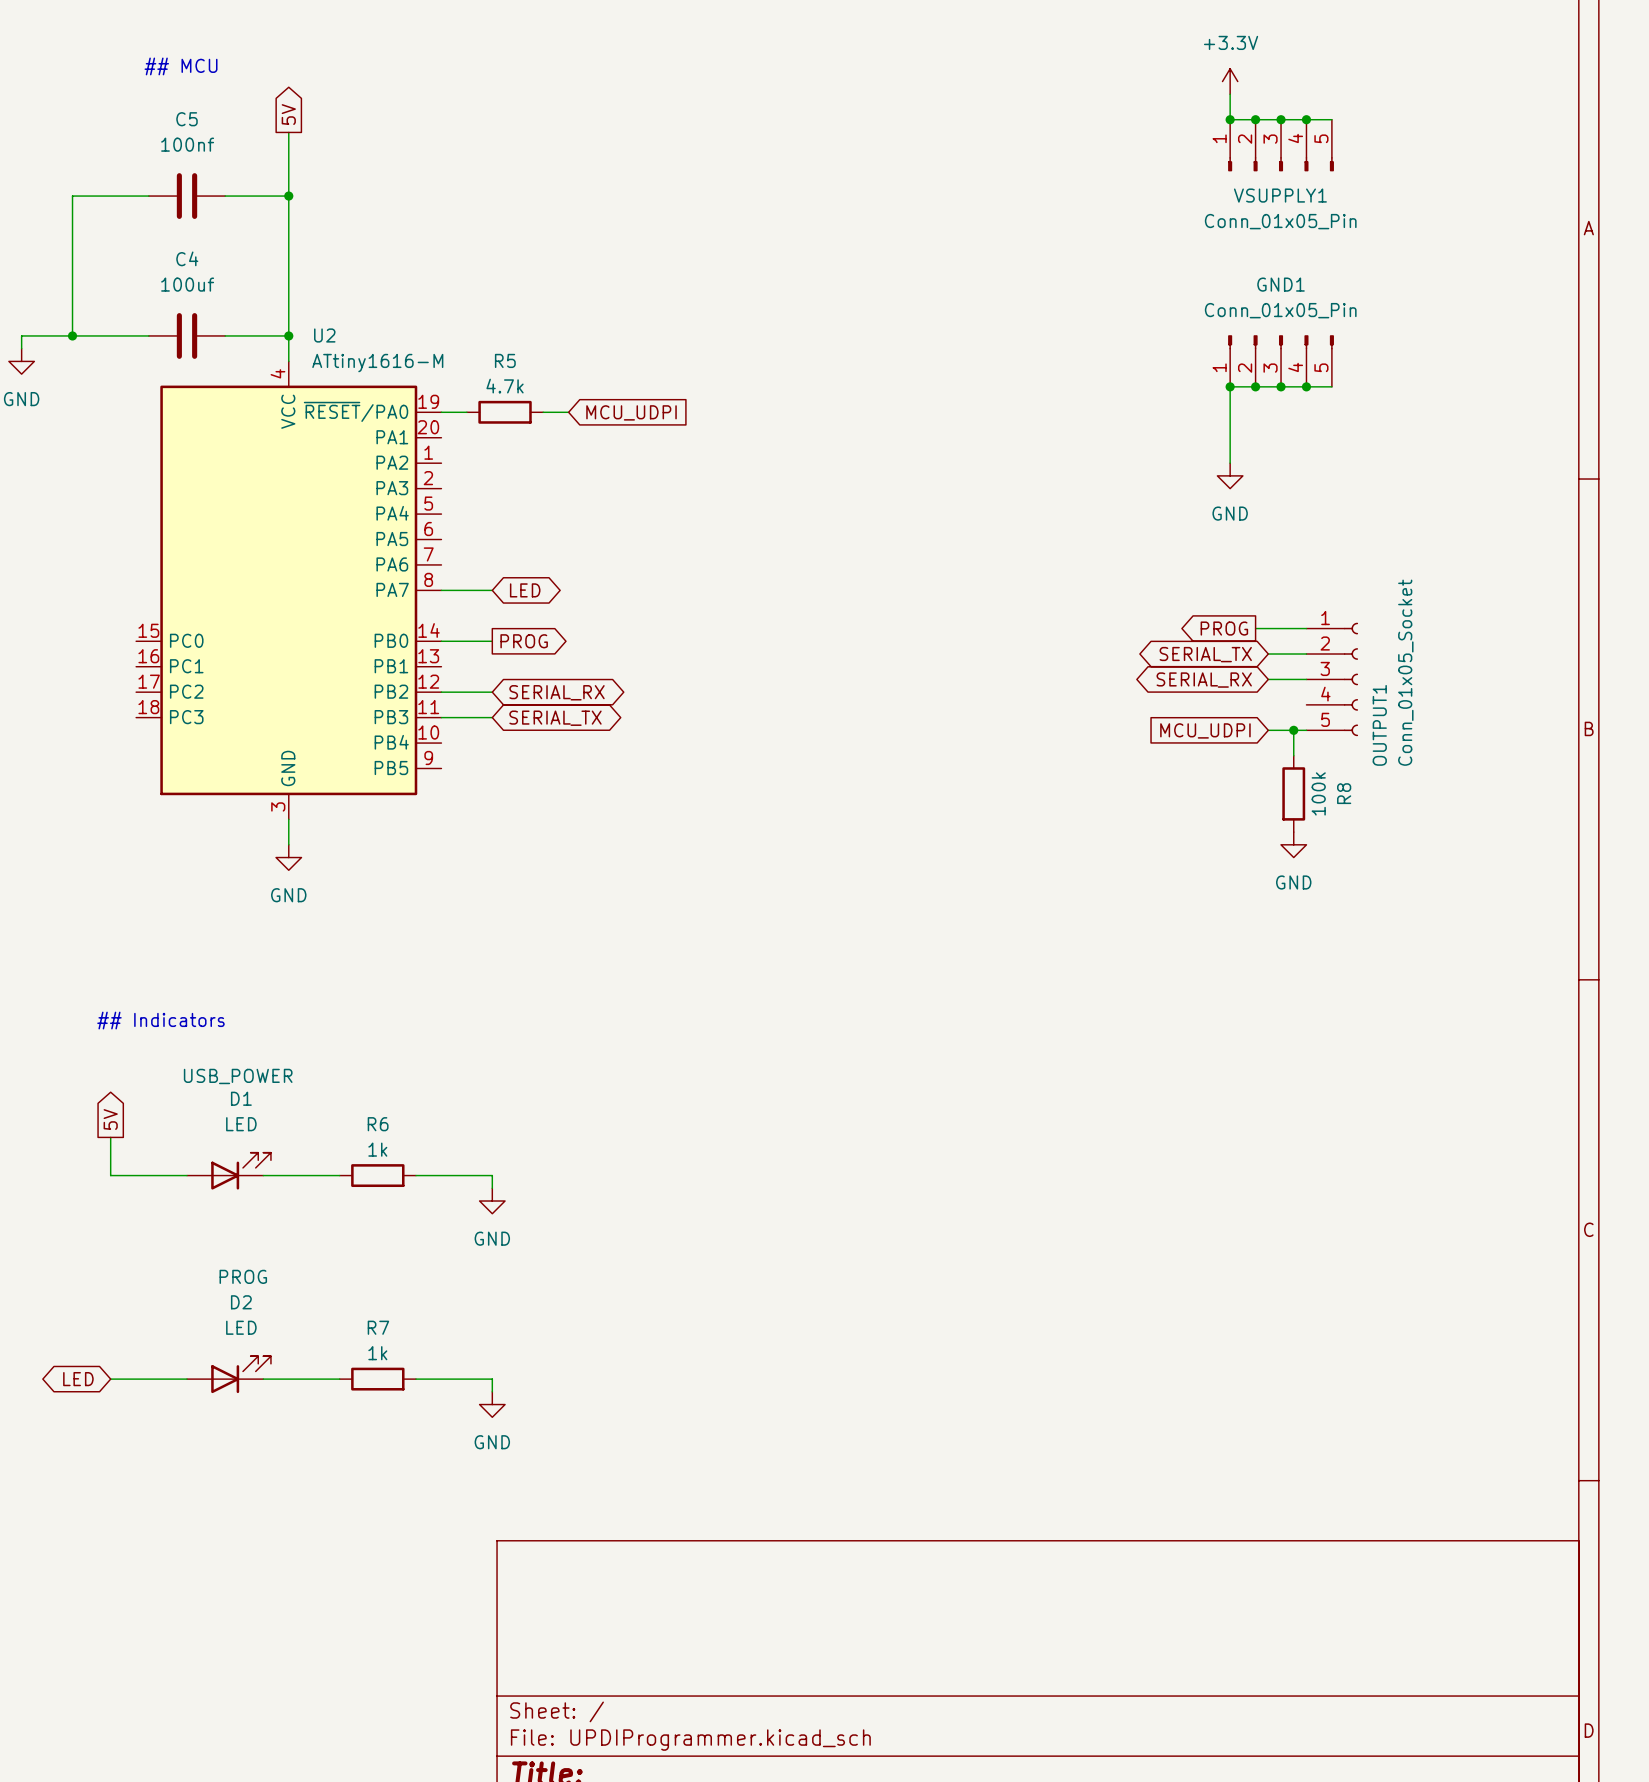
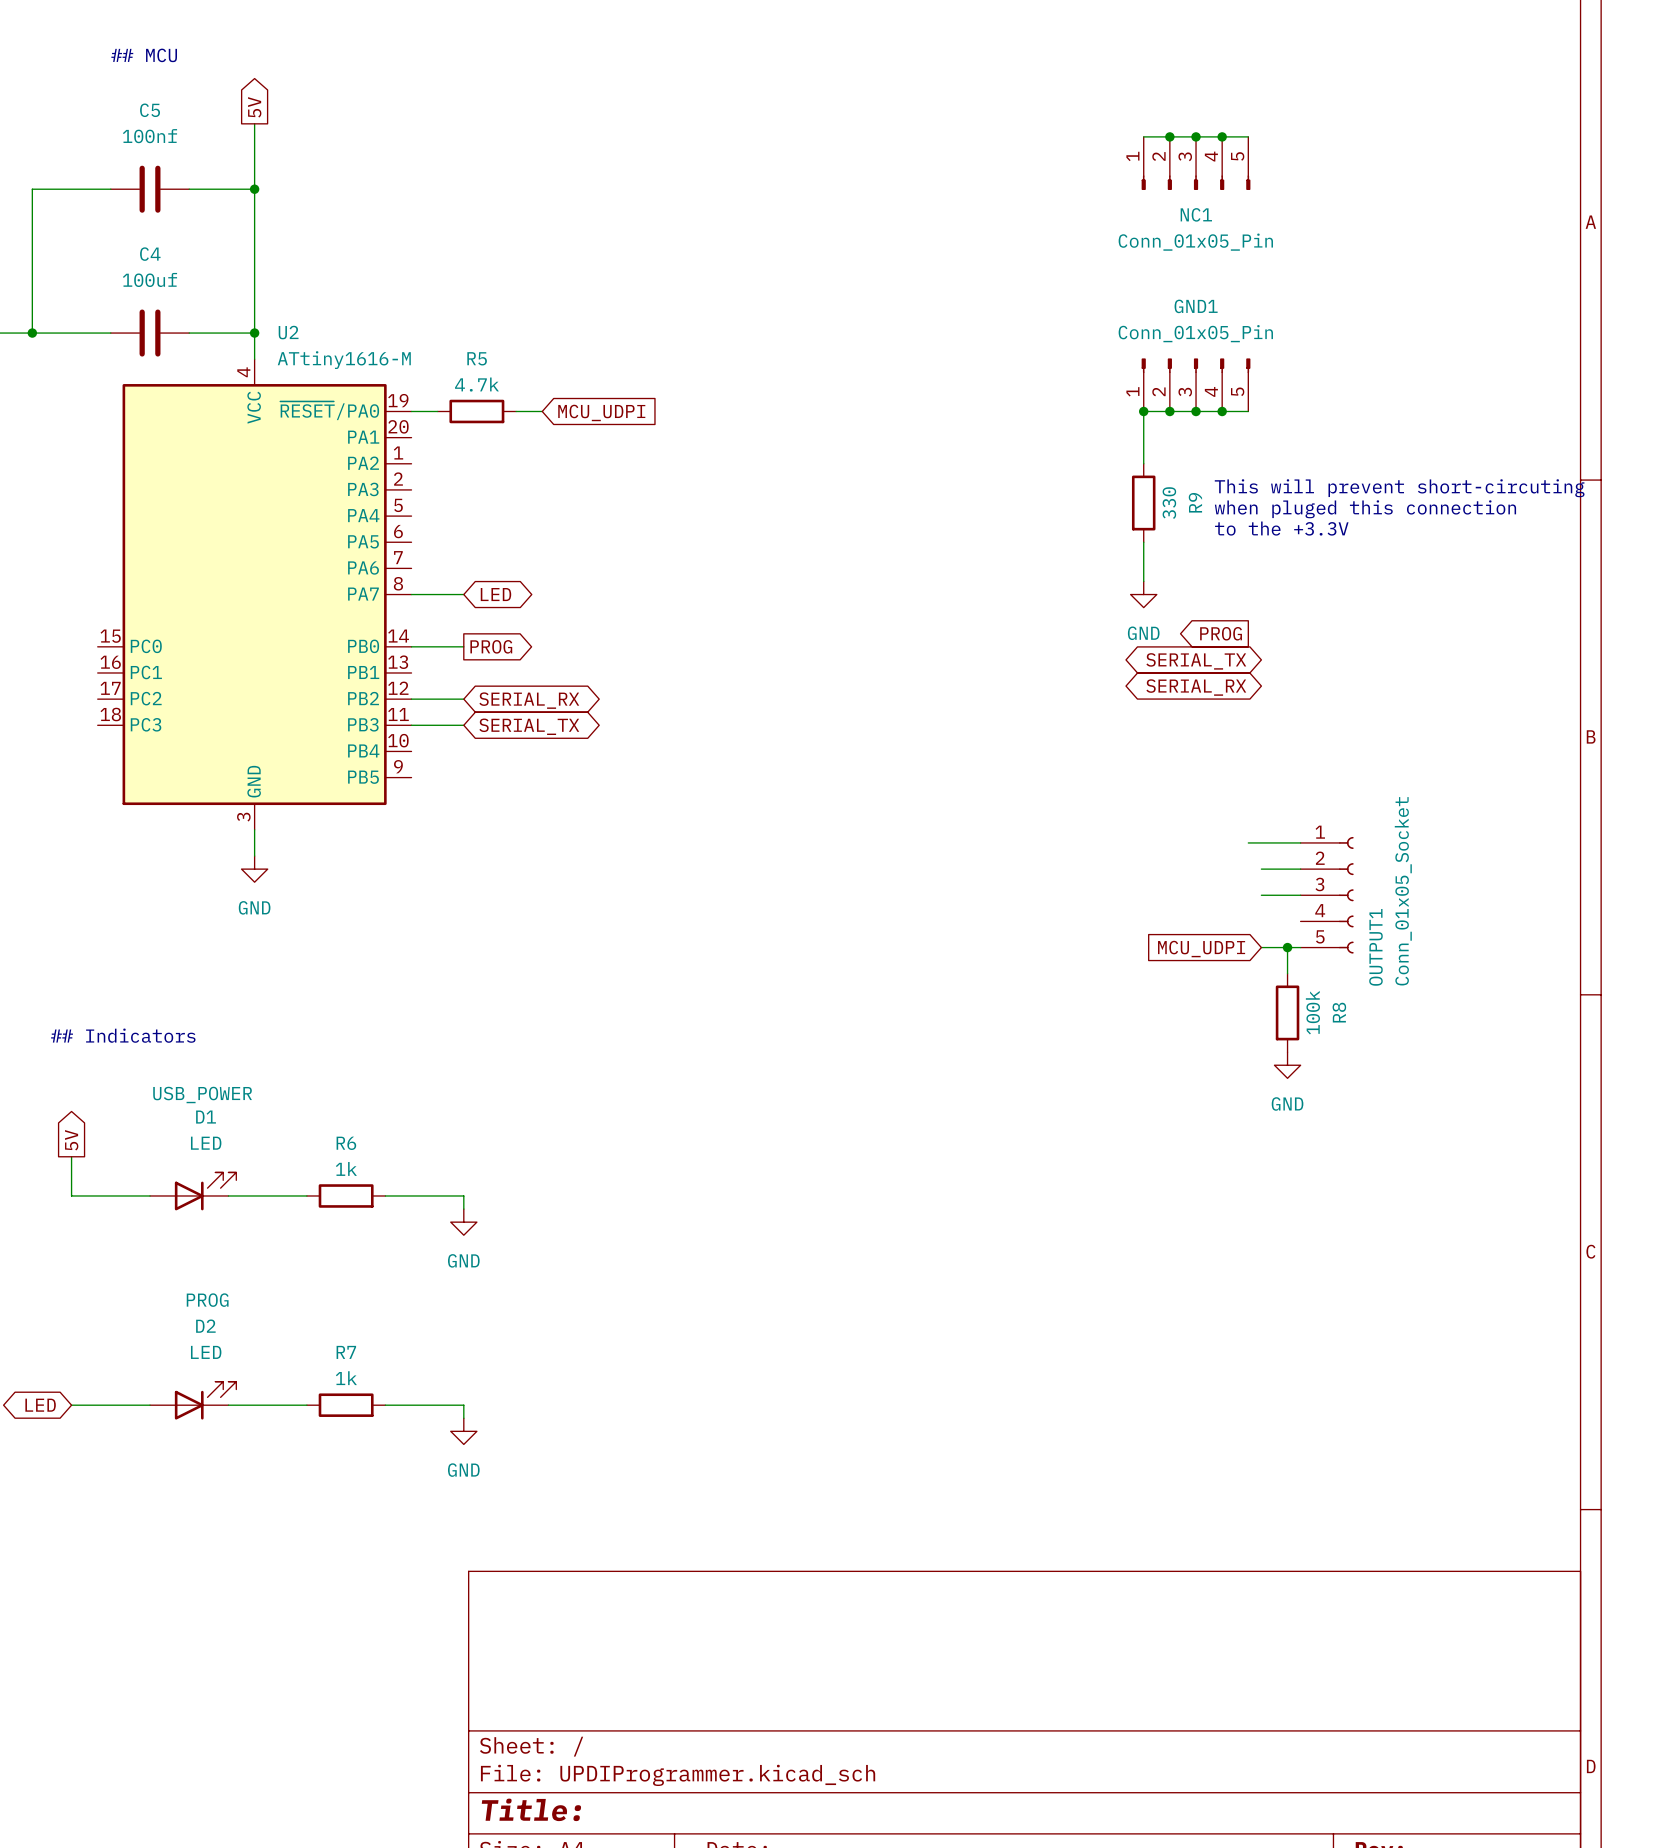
power symbol: +3.3V (1230, 81) -> none
wire: (1230, 94) (1230, 119) (1331, 119) -> none
junction: (1230, 119) -> none
junction: (1255, 119) -> none
junction: (1281, 119) -> none
junction: (1306, 119) -> none
wire: none -> (1143, 136) (1248, 136)
junction: none -> (1169, 136)
junction: none -> (1196, 136)
junction: none -> (1222, 136)
VSUPPLY1: Conn_01x05_Pin (1281, 145) -> none
NC1: none -> Conn_01x05_Pin (1196, 163)
GND1 position: (1281, 361) -> (1196, 384)
junction: (1230, 386) -> none
junction: (1255, 386) -> none
junction: (1281, 386) -> none
junction: (1306, 386) -> none
wire: (1331, 386) (1230, 386) (1230, 463) -> none
junction: none -> (1143, 411)
junction: none -> (1169, 411)
junction: none -> (1196, 411)
junction: none -> (1222, 411)
wire: none -> (1248, 411) (1143, 411) (1143, 463)
power symbol position: GND (1230, 475) -> GND (1143, 594)
text: none -> This will prevent short-circuting (1399, 488)
R9: none -> 330 (1143, 503)
text: none -> when pluged this connection (1365, 509)
text: none -> to the +3.3V (1281, 528)
wire: none -> (1143, 542) (1143, 581)
wire: (1255, 628) (1306, 628) -> (1248, 842) (1300, 842)
wire: (1268, 654) (1306, 654) -> (1261, 869) (1300, 869)
wire: (1268, 679) (1306, 679) -> (1261, 895) (1300, 895)
OUTPUT1 position: (1332, 679) -> (1327, 895)
global label position: MCU_UDPI (1205, 730) -> MCU_UDPI (1201, 949)
wire: (1268, 730) (1306, 730) -> (1261, 947) (1300, 947)
wire: (1293, 730) (1293, 755) -> (1287, 947) (1287, 973)
junction: (1293, 730) -> none
R8 position: (1293, 793) -> (1287, 1012)
power symbol: GND (1293, 844) -> none
junction: none -> (1287, 947)
power symbol: none -> GND (1287, 1065)

